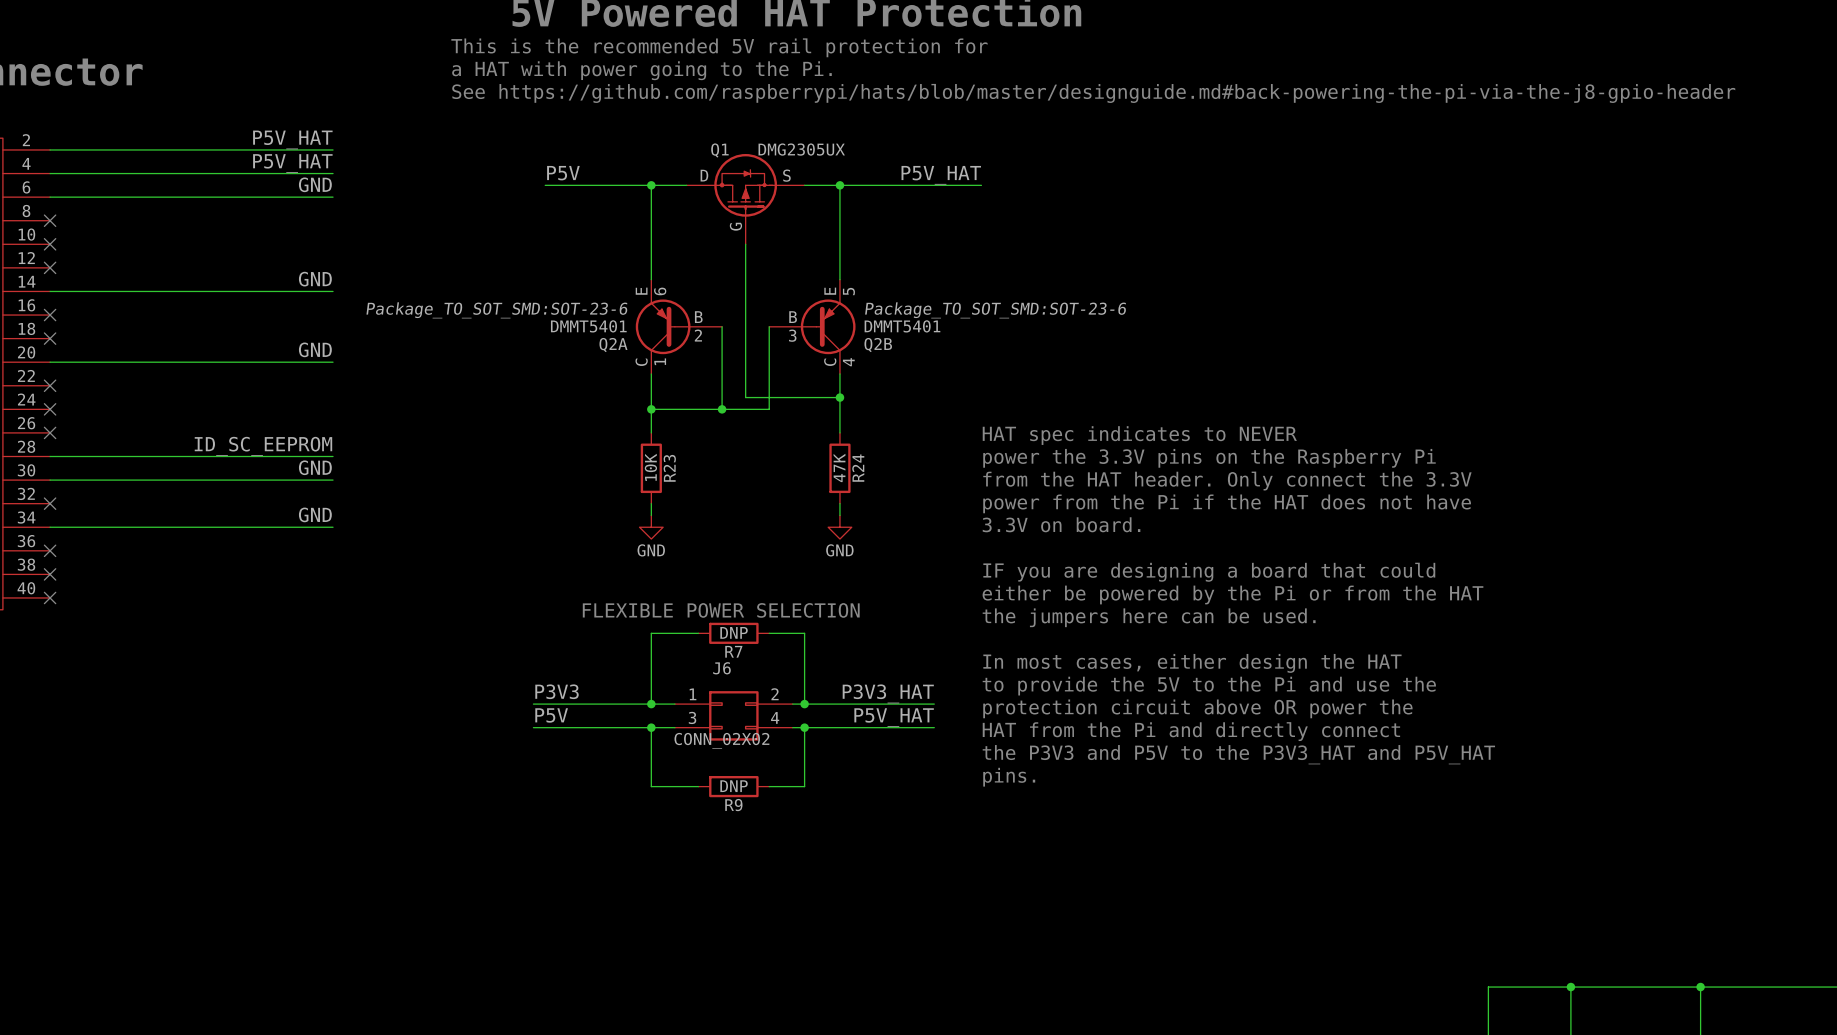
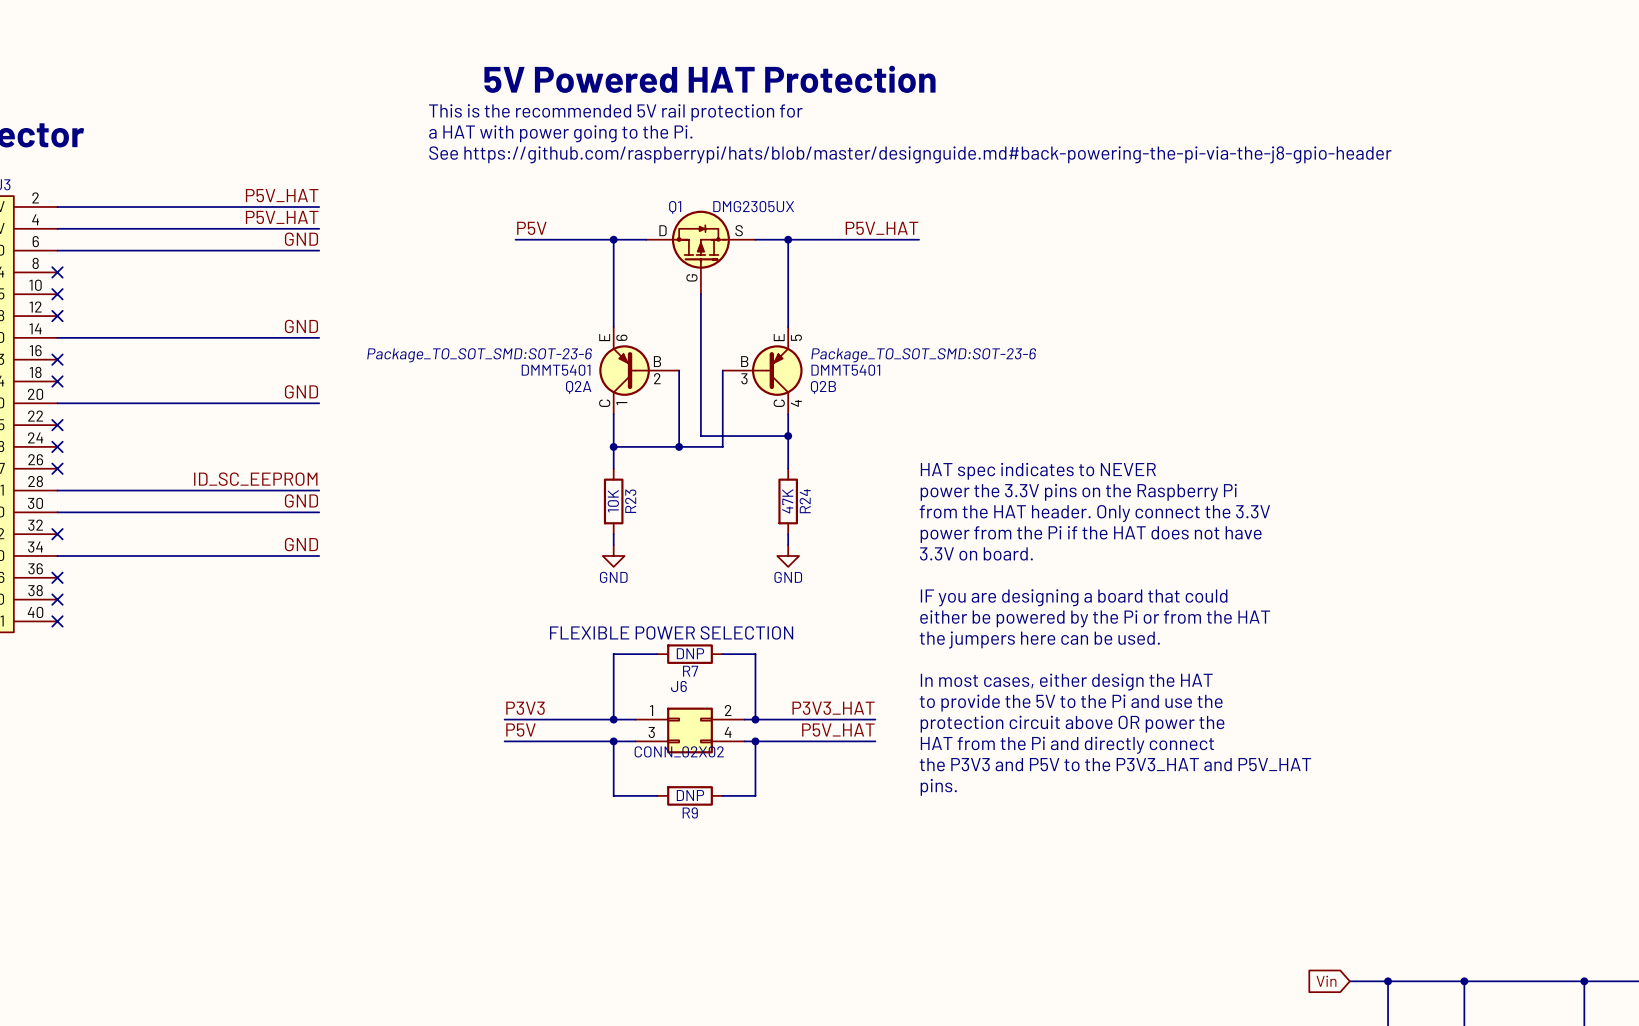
global label: none -> Vin (1326, 981)
wire: none -> (1349, 981) (1388, 981)
junction: none -> (1388, 981)

